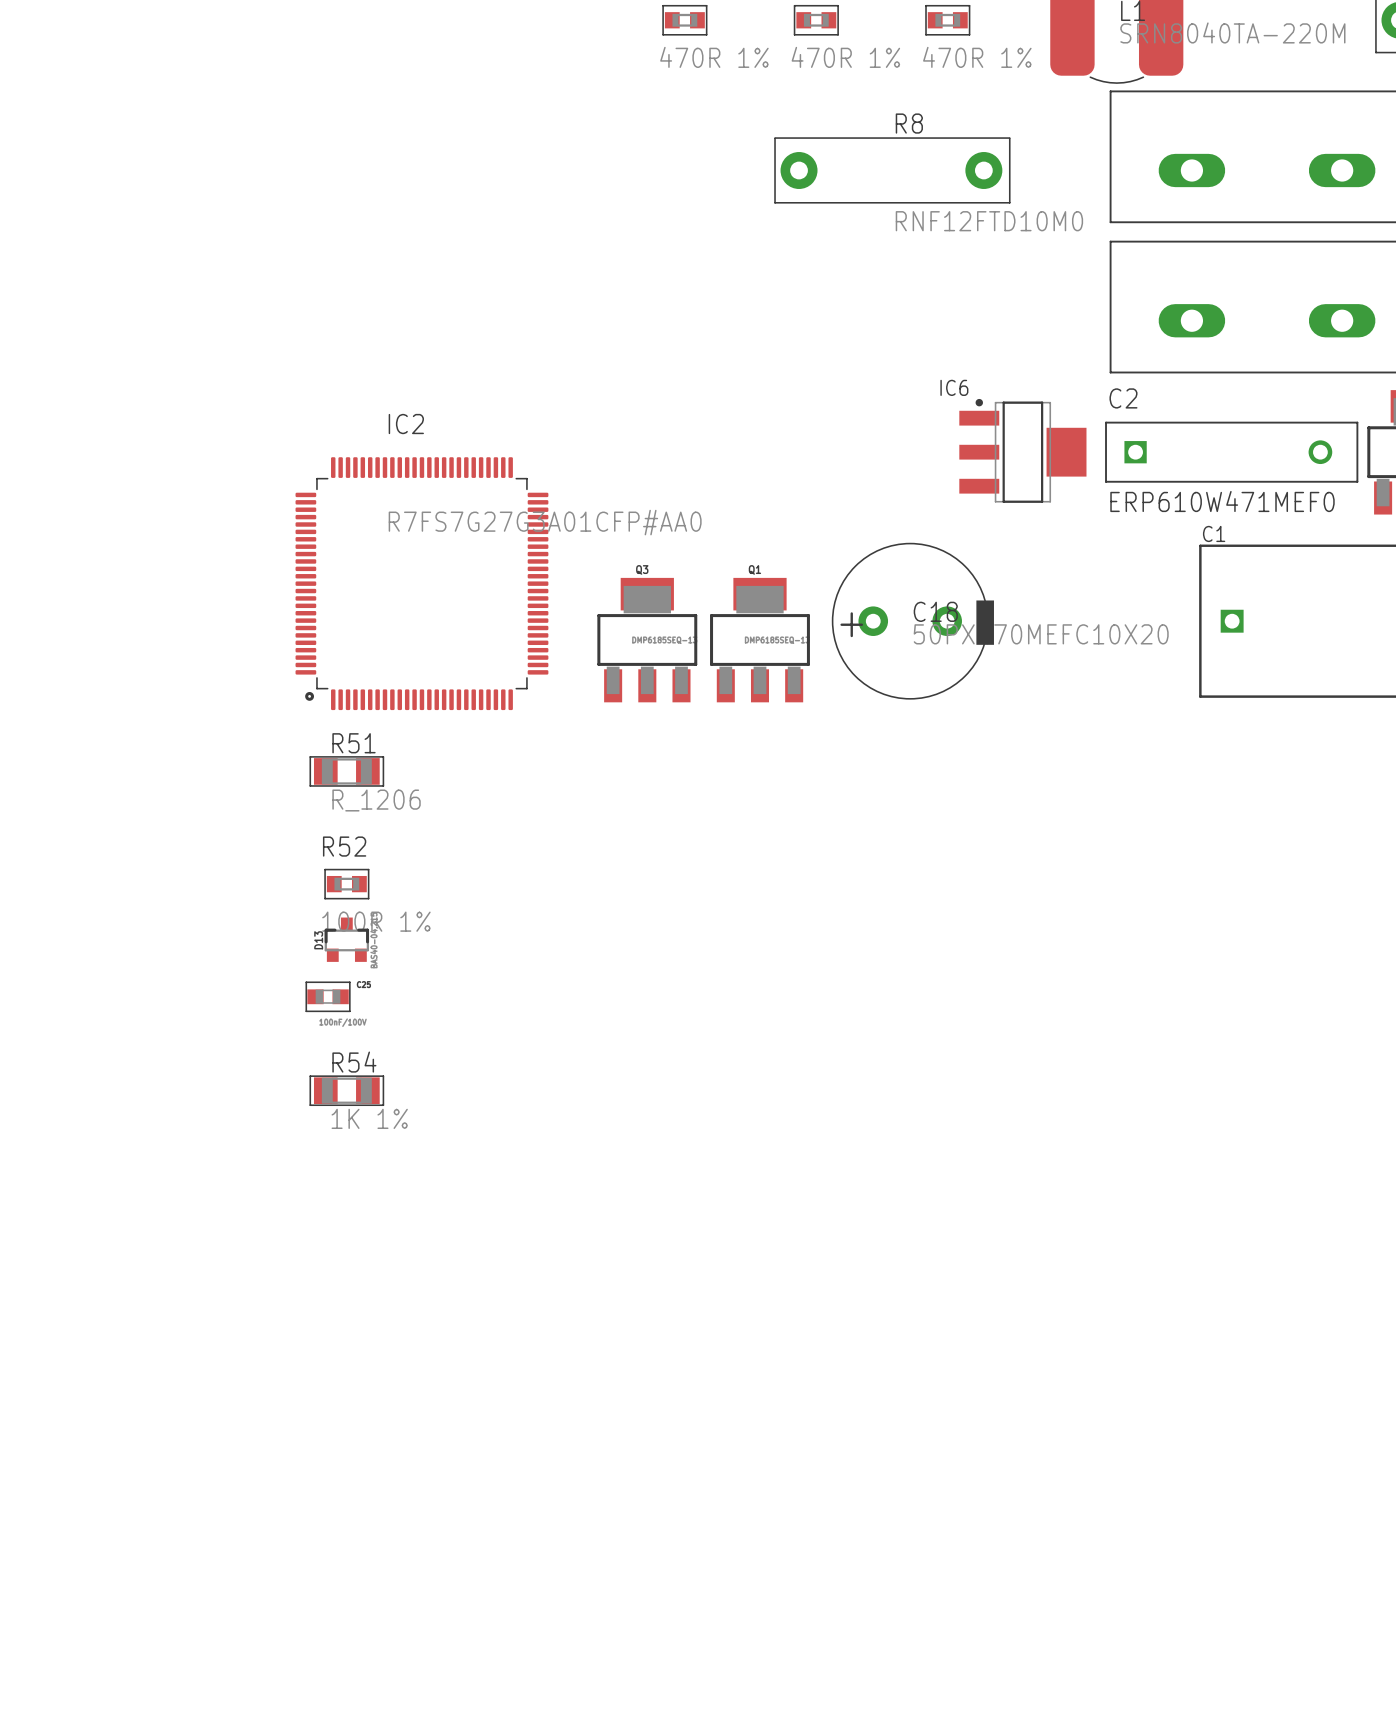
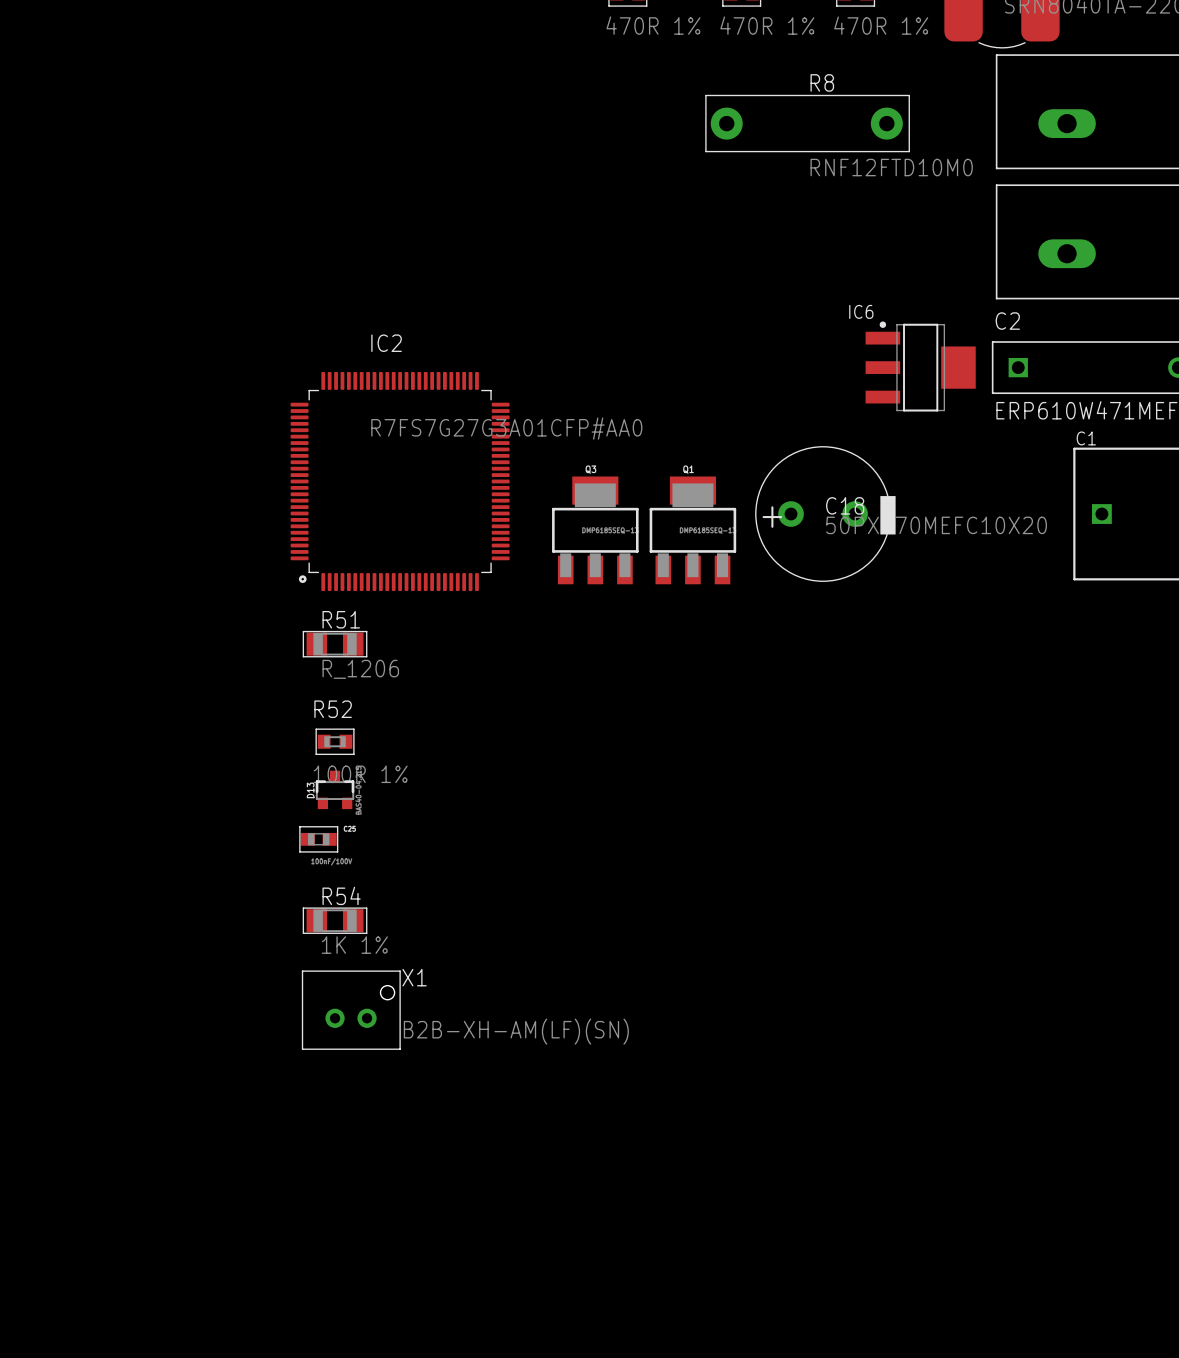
X1: none -> B2B-XH-AM(LF)(SN) (351, 1010)

